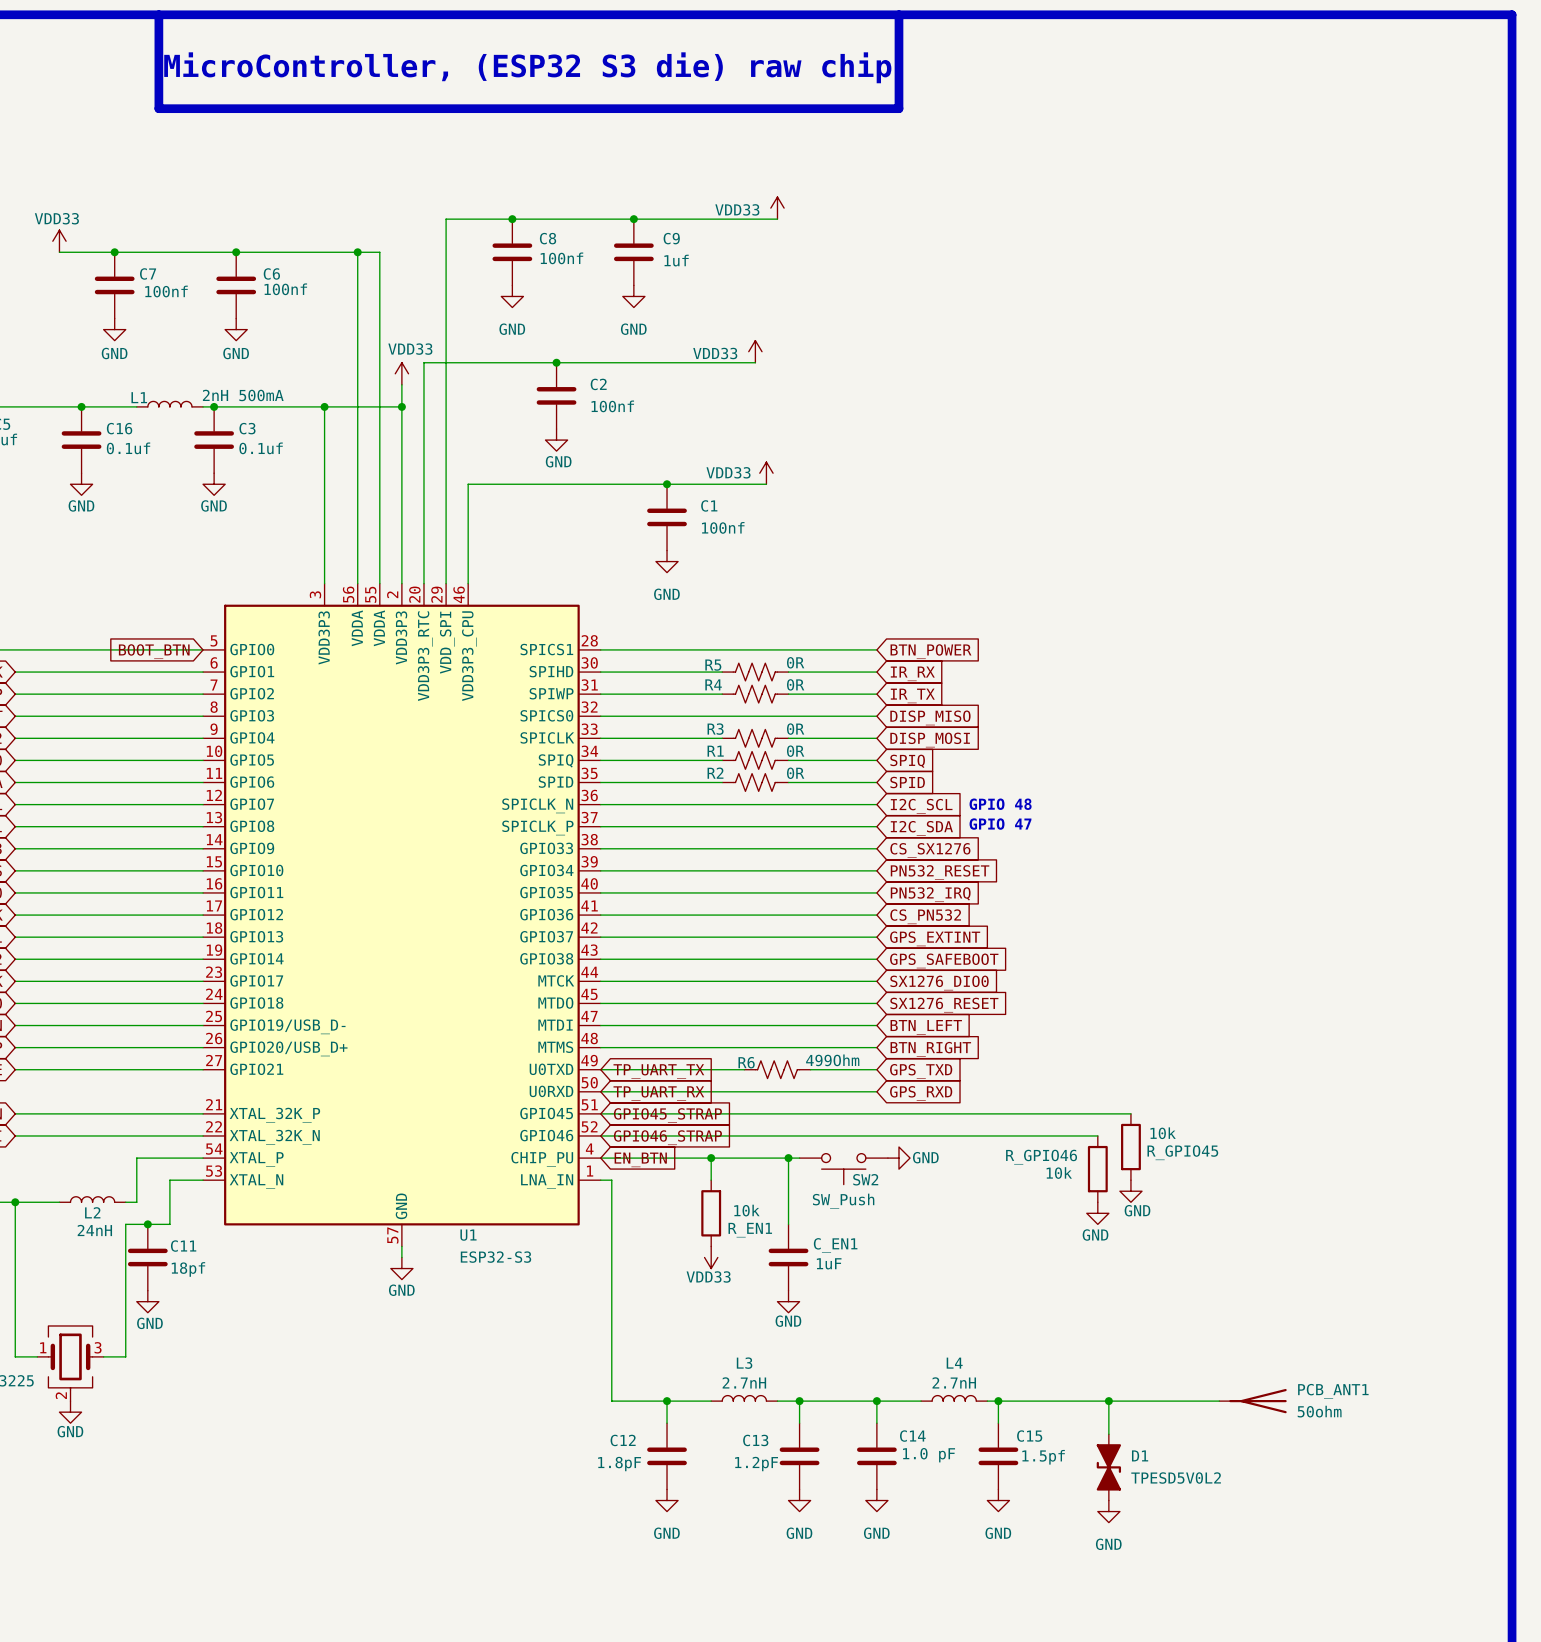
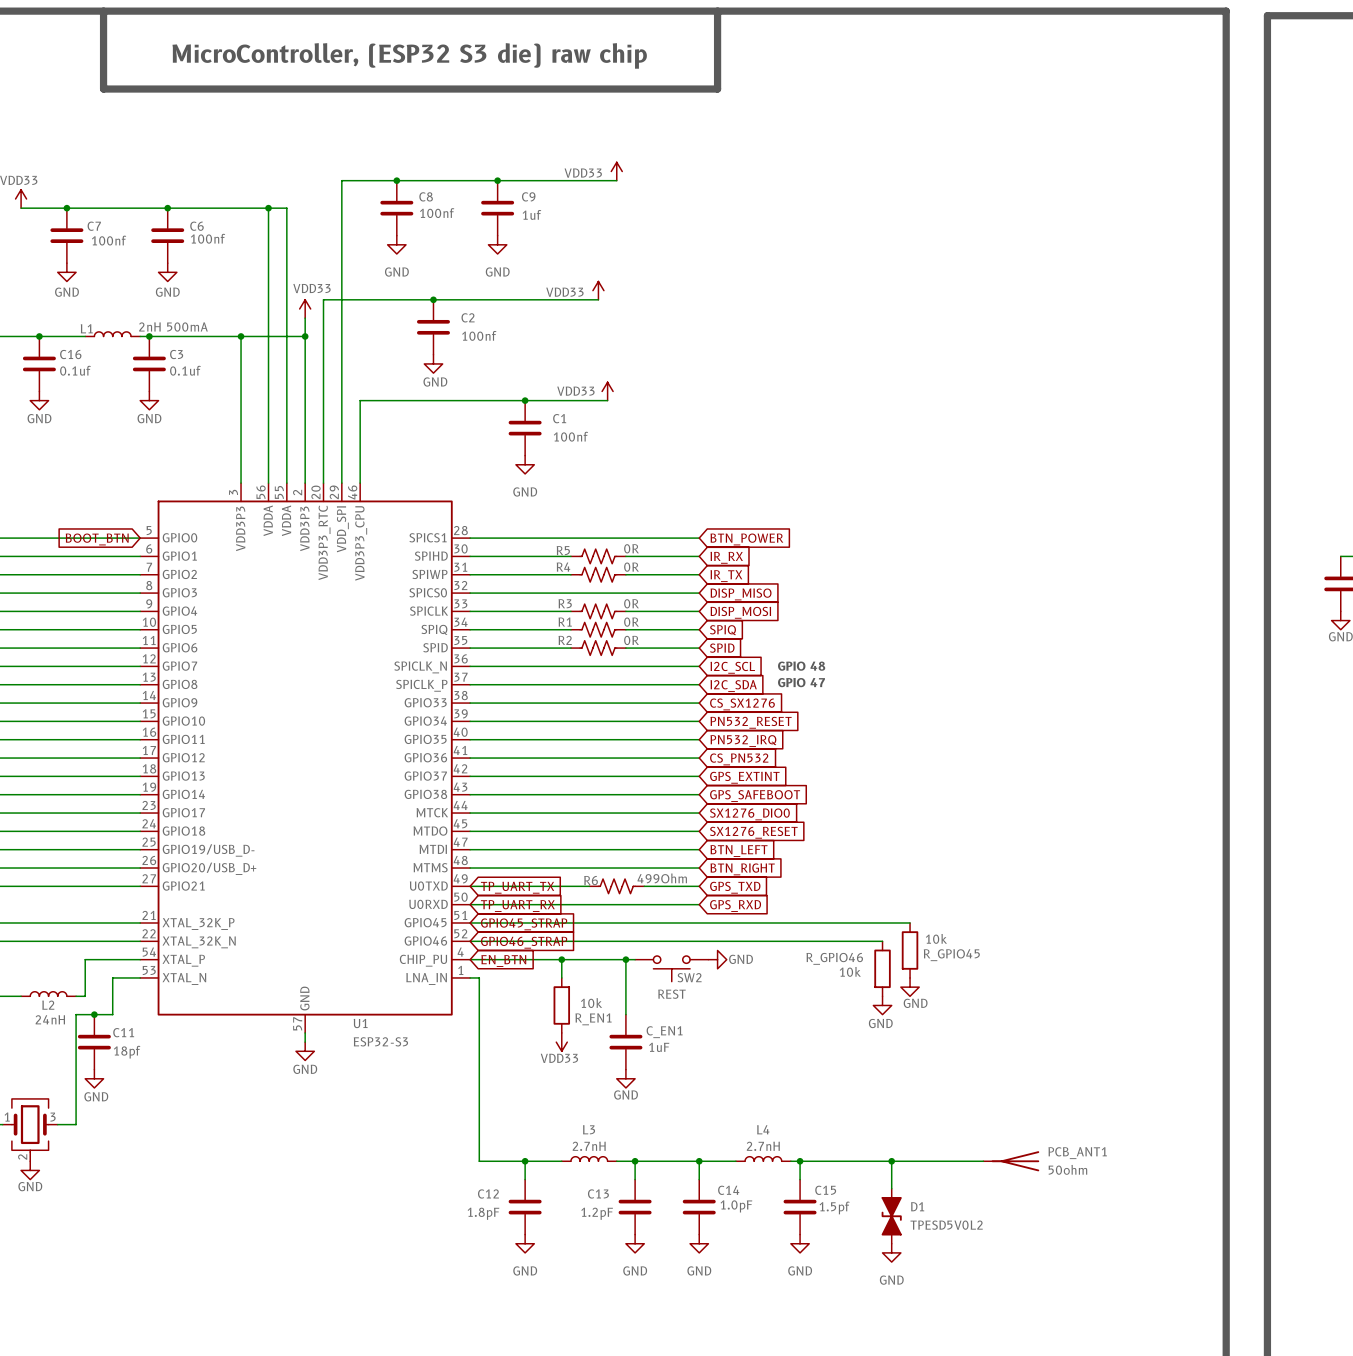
SW2 value: SW_Push (843, 1201) -> REST (671, 994)
C14 value: 1.0 pF (929, 1455) -> 1.0pF (736, 1206)

